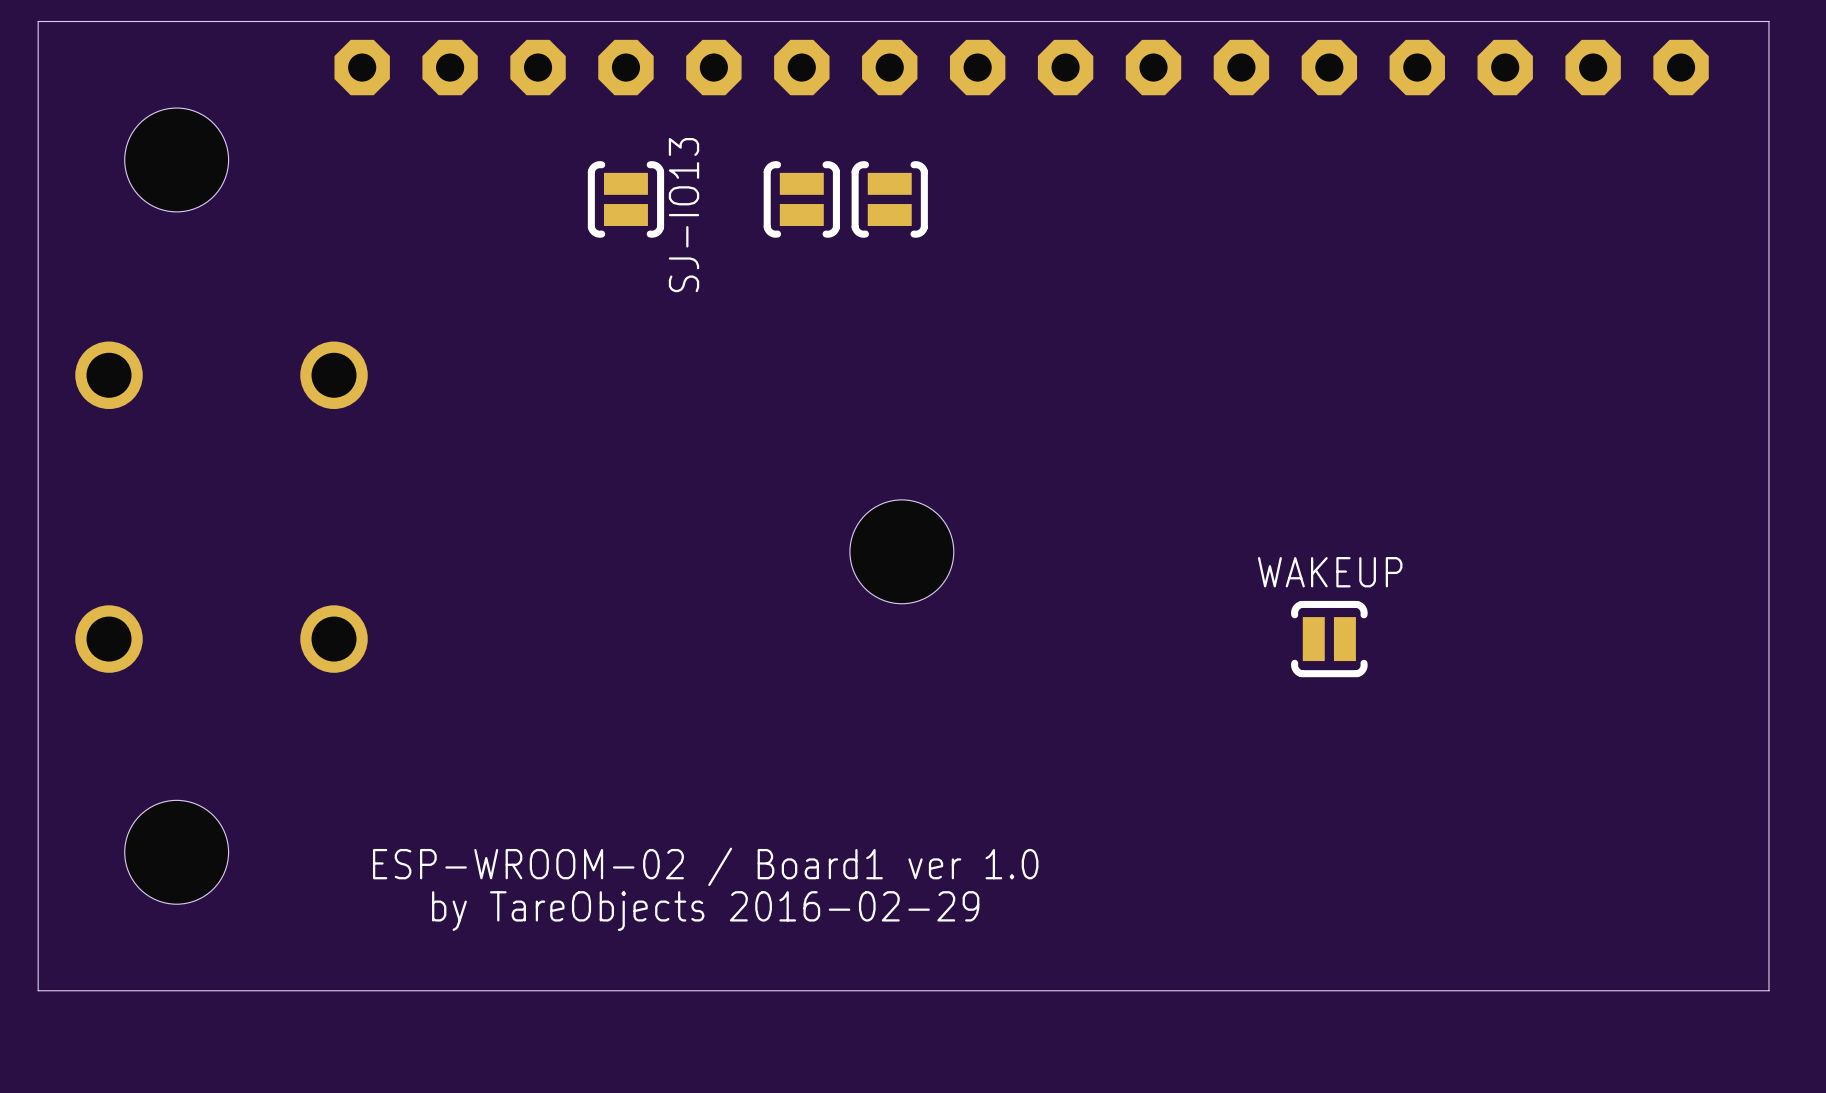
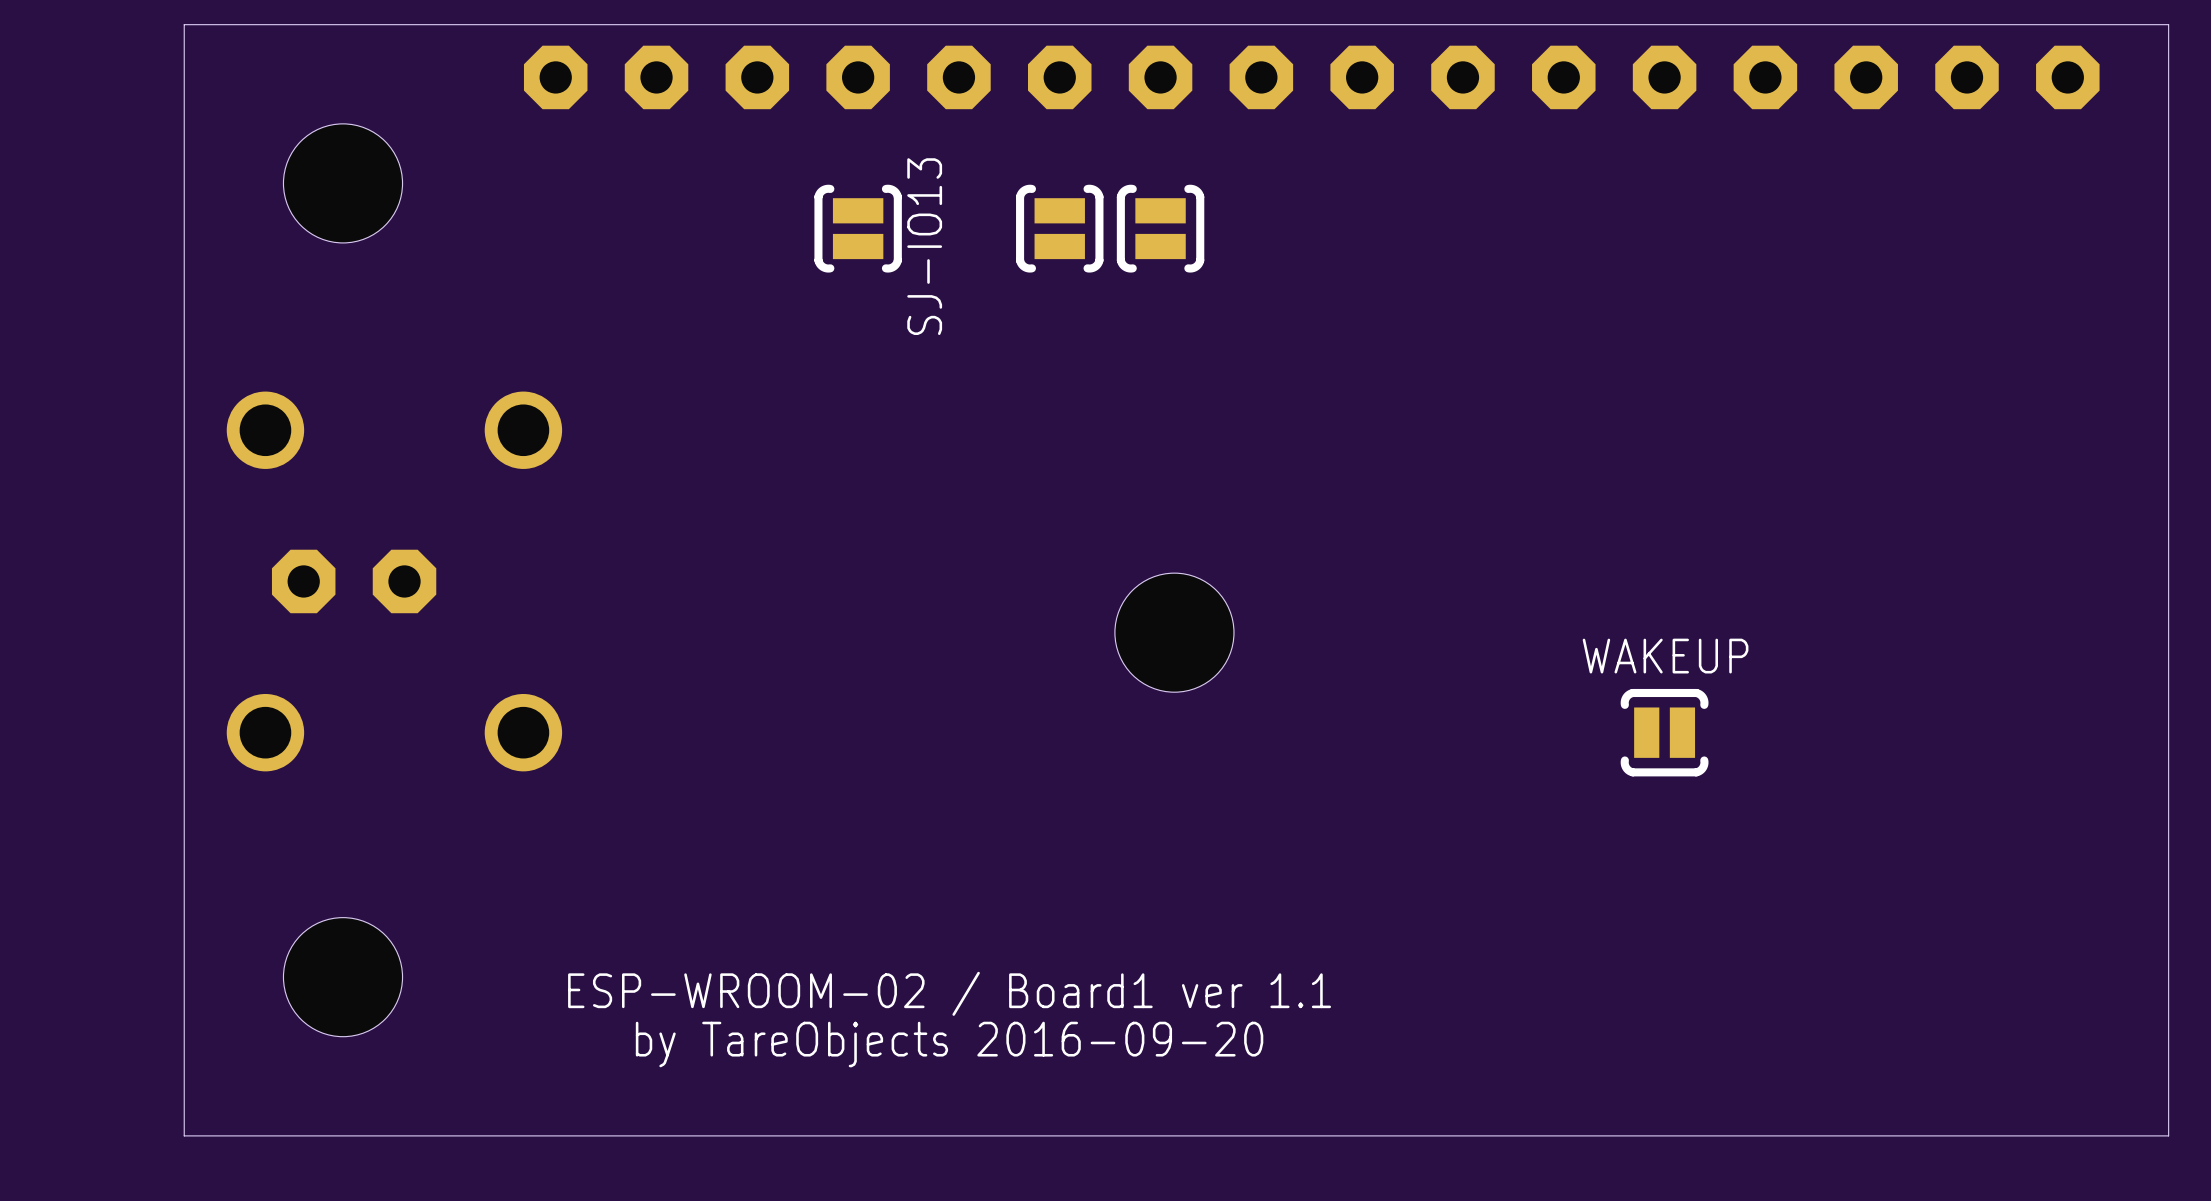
part: none -> (303, 581)
part: none -> (404, 581)
text: ESP-WROOM-02 / Board1 ver 1.0 (705, 866) -> ESP-WROOM-02 / Board1 ver 1.1 (949, 993)
text: by TareObjects 2016-02-29 (705, 911) -> by TareObjects 2016-09-20 (949, 1044)

